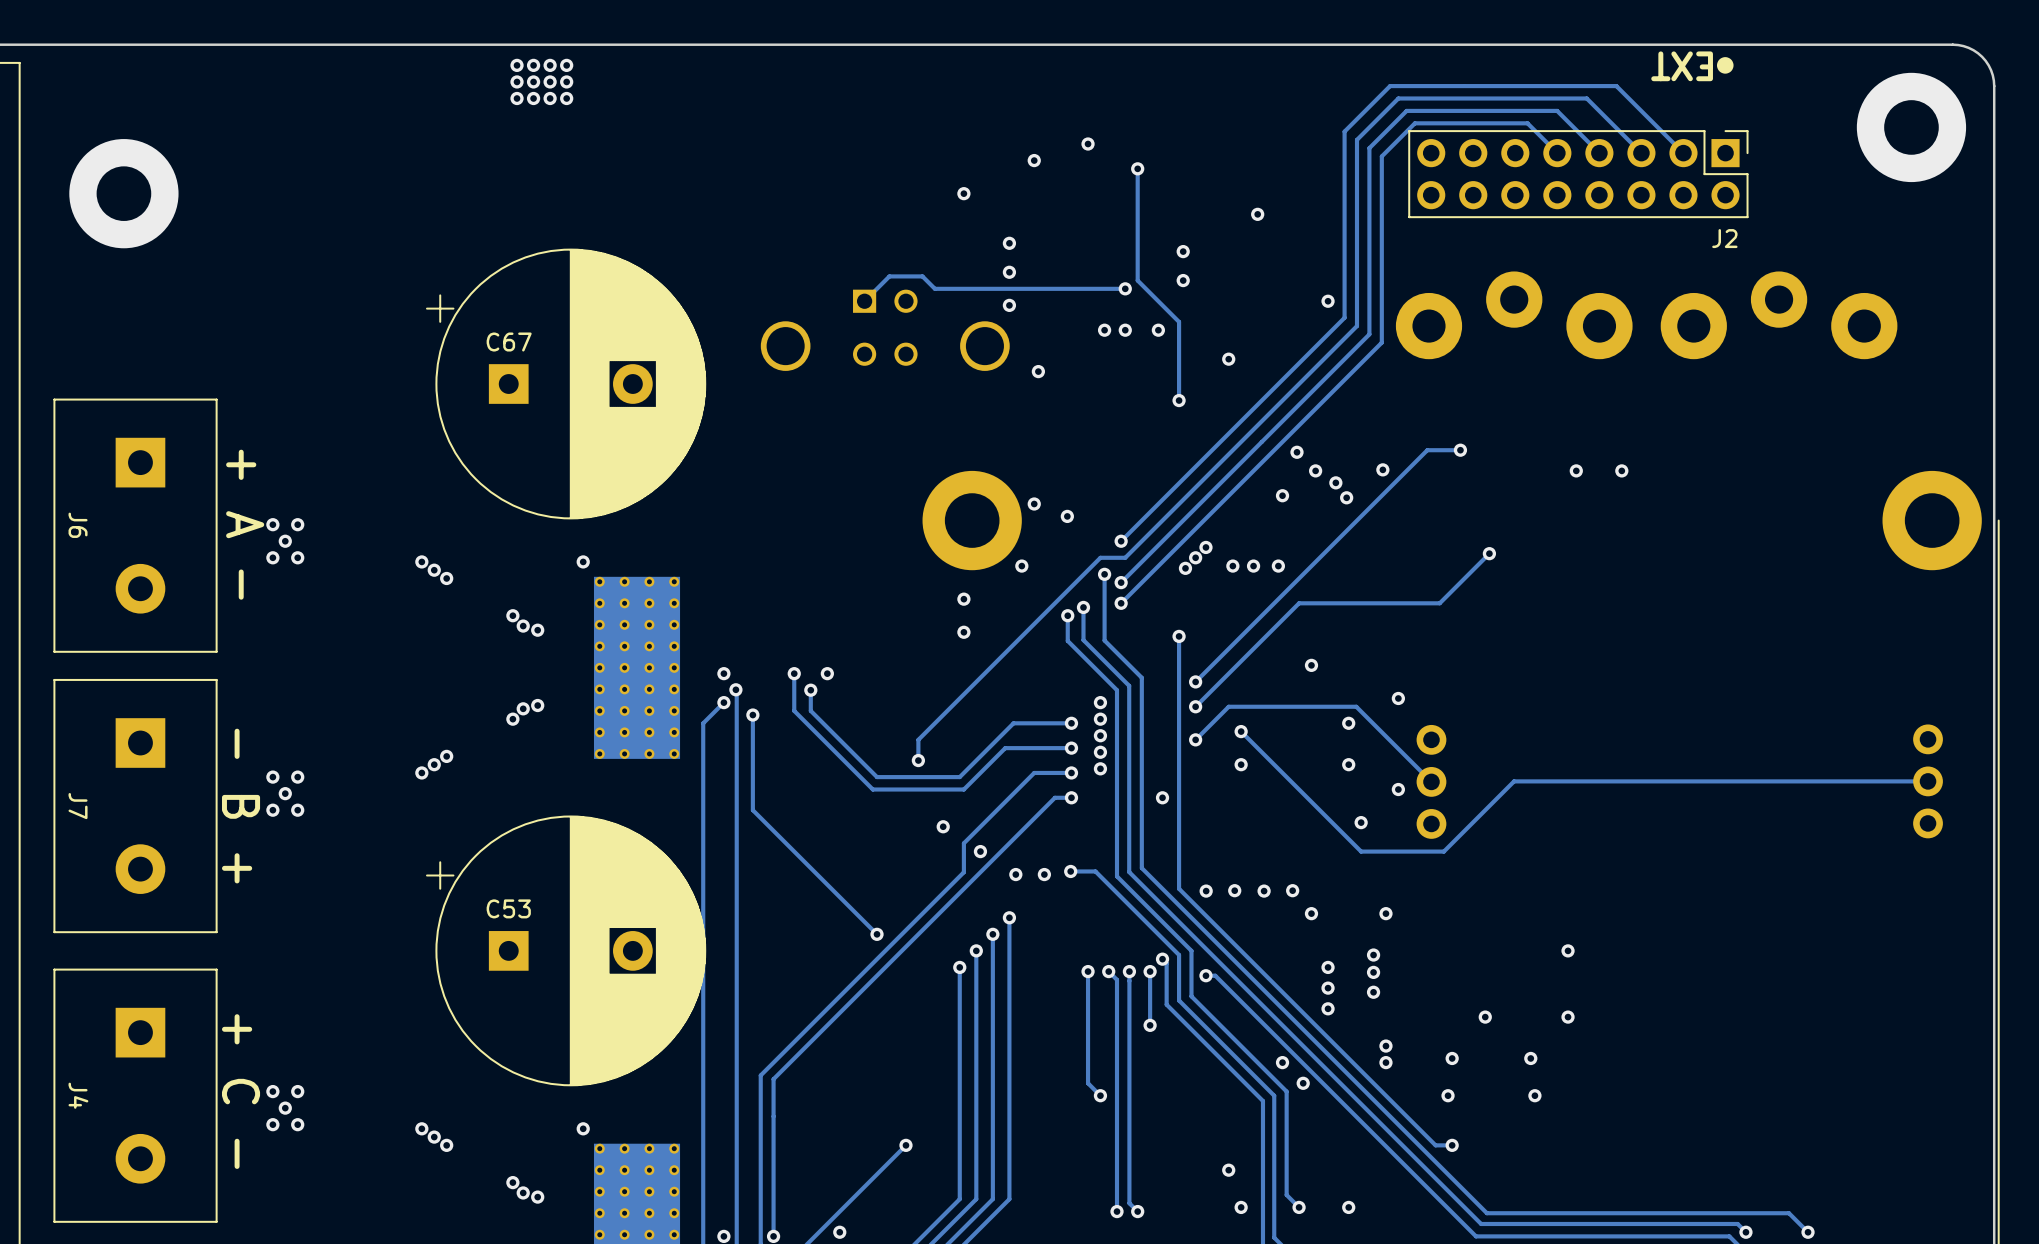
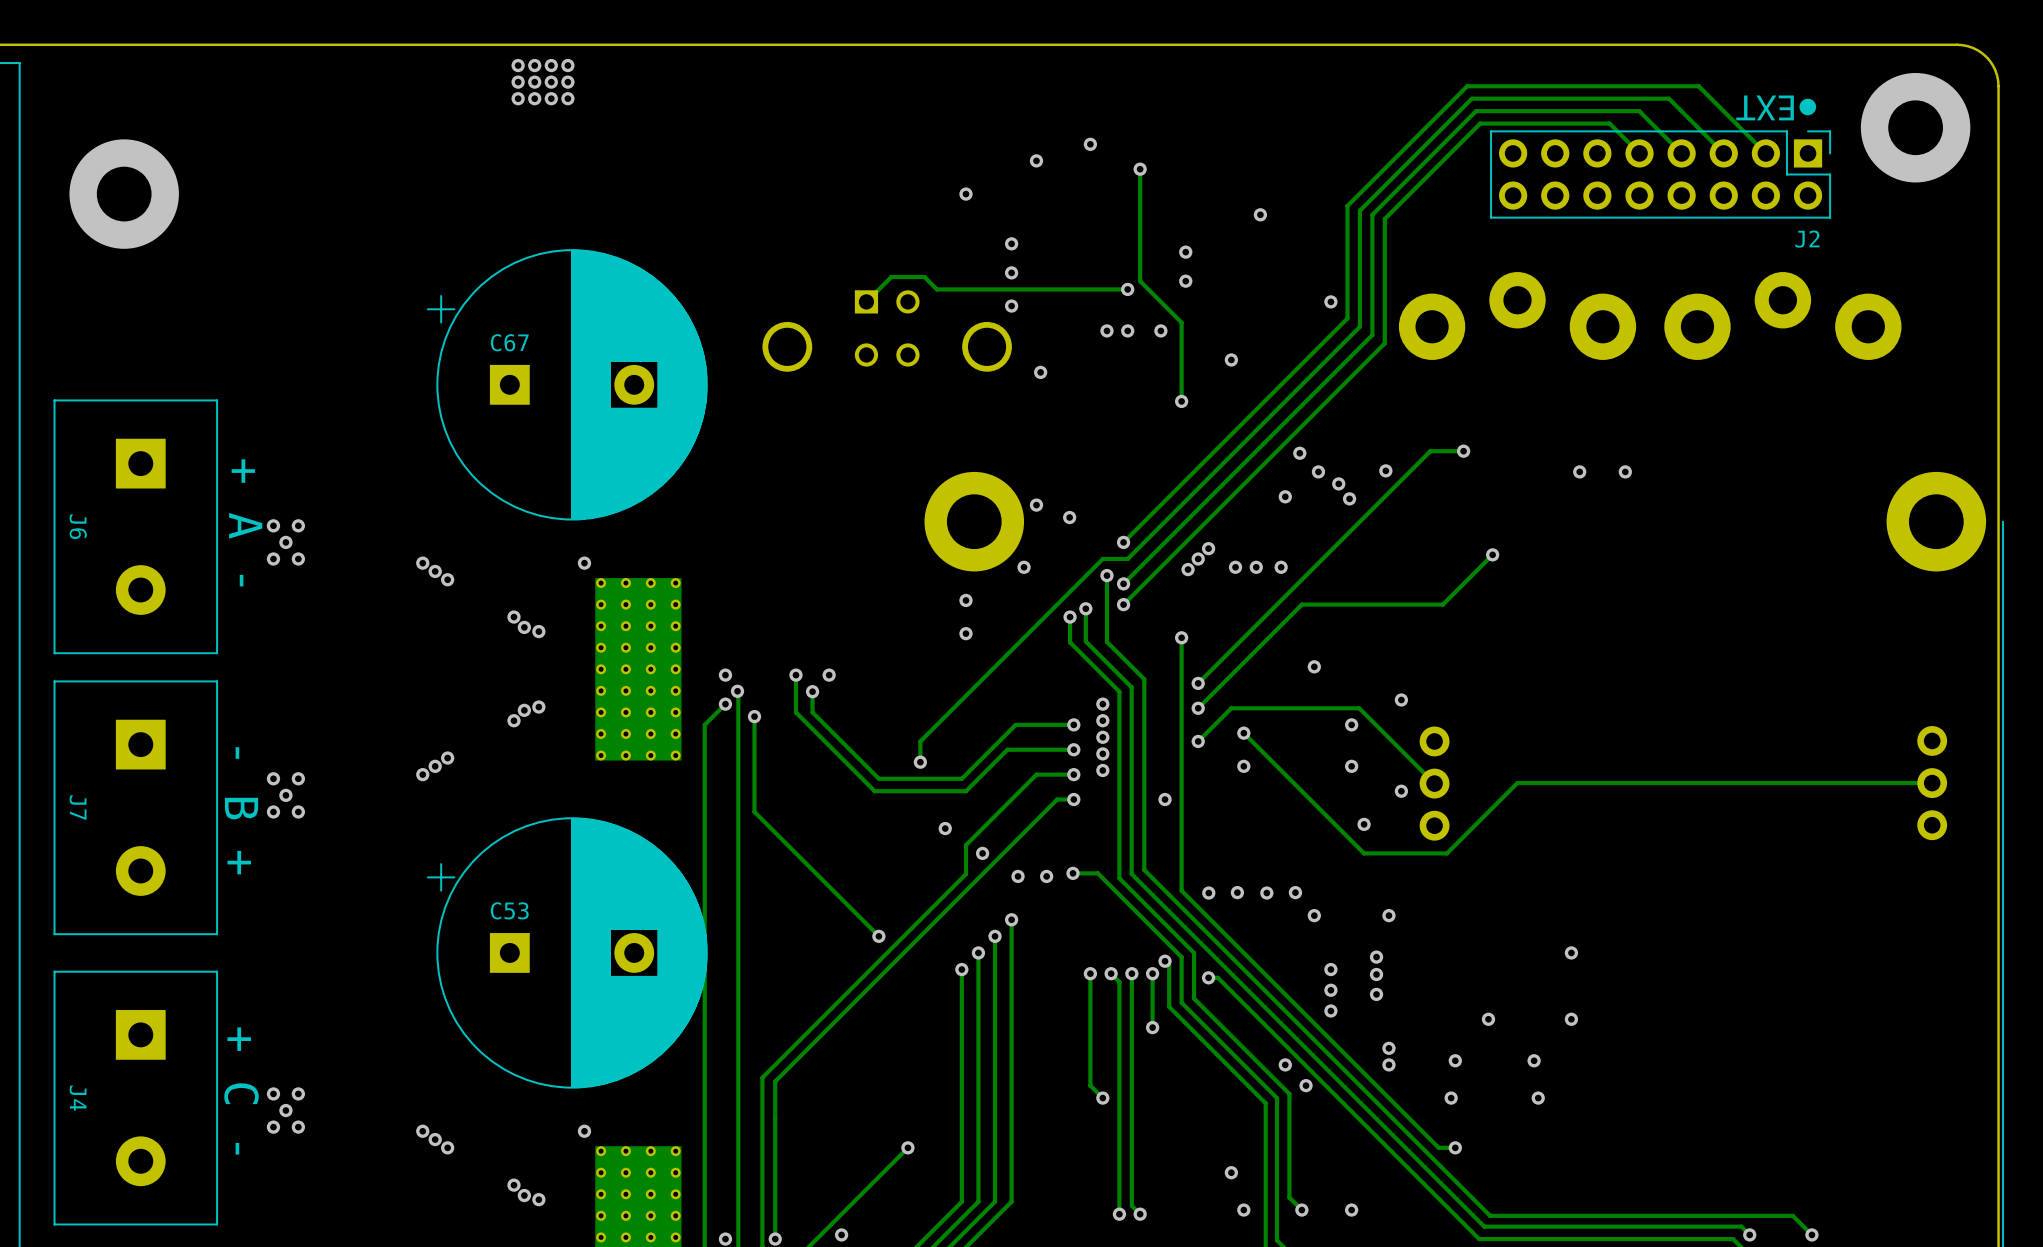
drawing position: (1725, 65) -> (1807, 107)
text position: EXT (1682, 66) -> EXT (1765, 107)
track: (1464, 86) (1390, 86) (1344, 131) (1344, 205) -> (1467, 86) (1347, 205)
track: (1616, 86) (1683, 153) -> (1619, 86) (1698, 86) (1765, 153)
track: (1468, 98) (1398, 98) (1357, 139) (1357, 210) -> (1471, 98) (1359, 210)
track: (1586, 98) (1641, 153) -> (1590, 98) (1669, 98) (1723, 153)
track: (1472, 110) (1406, 110) (1369, 148) (1369, 214) -> (1476, 111) (1372, 214)
track: (1557, 110) (1599, 153) -> (1560, 111) (1639, 111) (1681, 153)
track: (1476, 123) (1414, 123) (1381, 156) (1381, 218) -> (1480, 123) (1384, 218)
track: (1527, 123) (1557, 153) -> (1530, 123) (1609, 123) (1639, 153)
J2 position: (1578, 174) -> (1660, 174)

